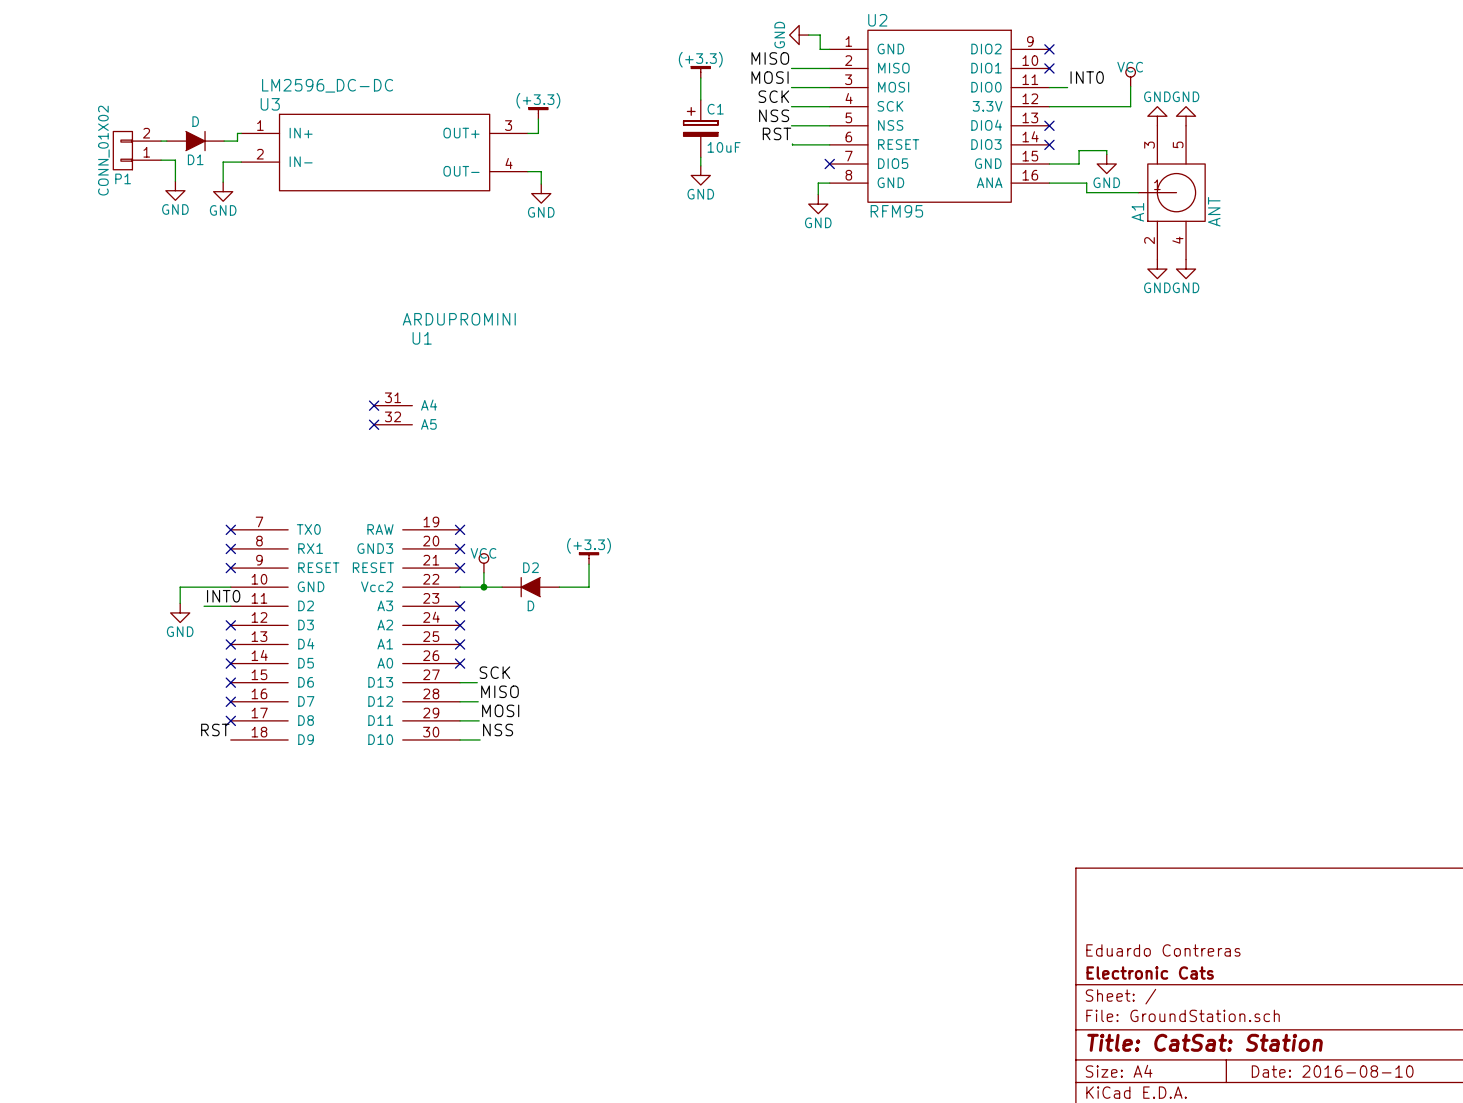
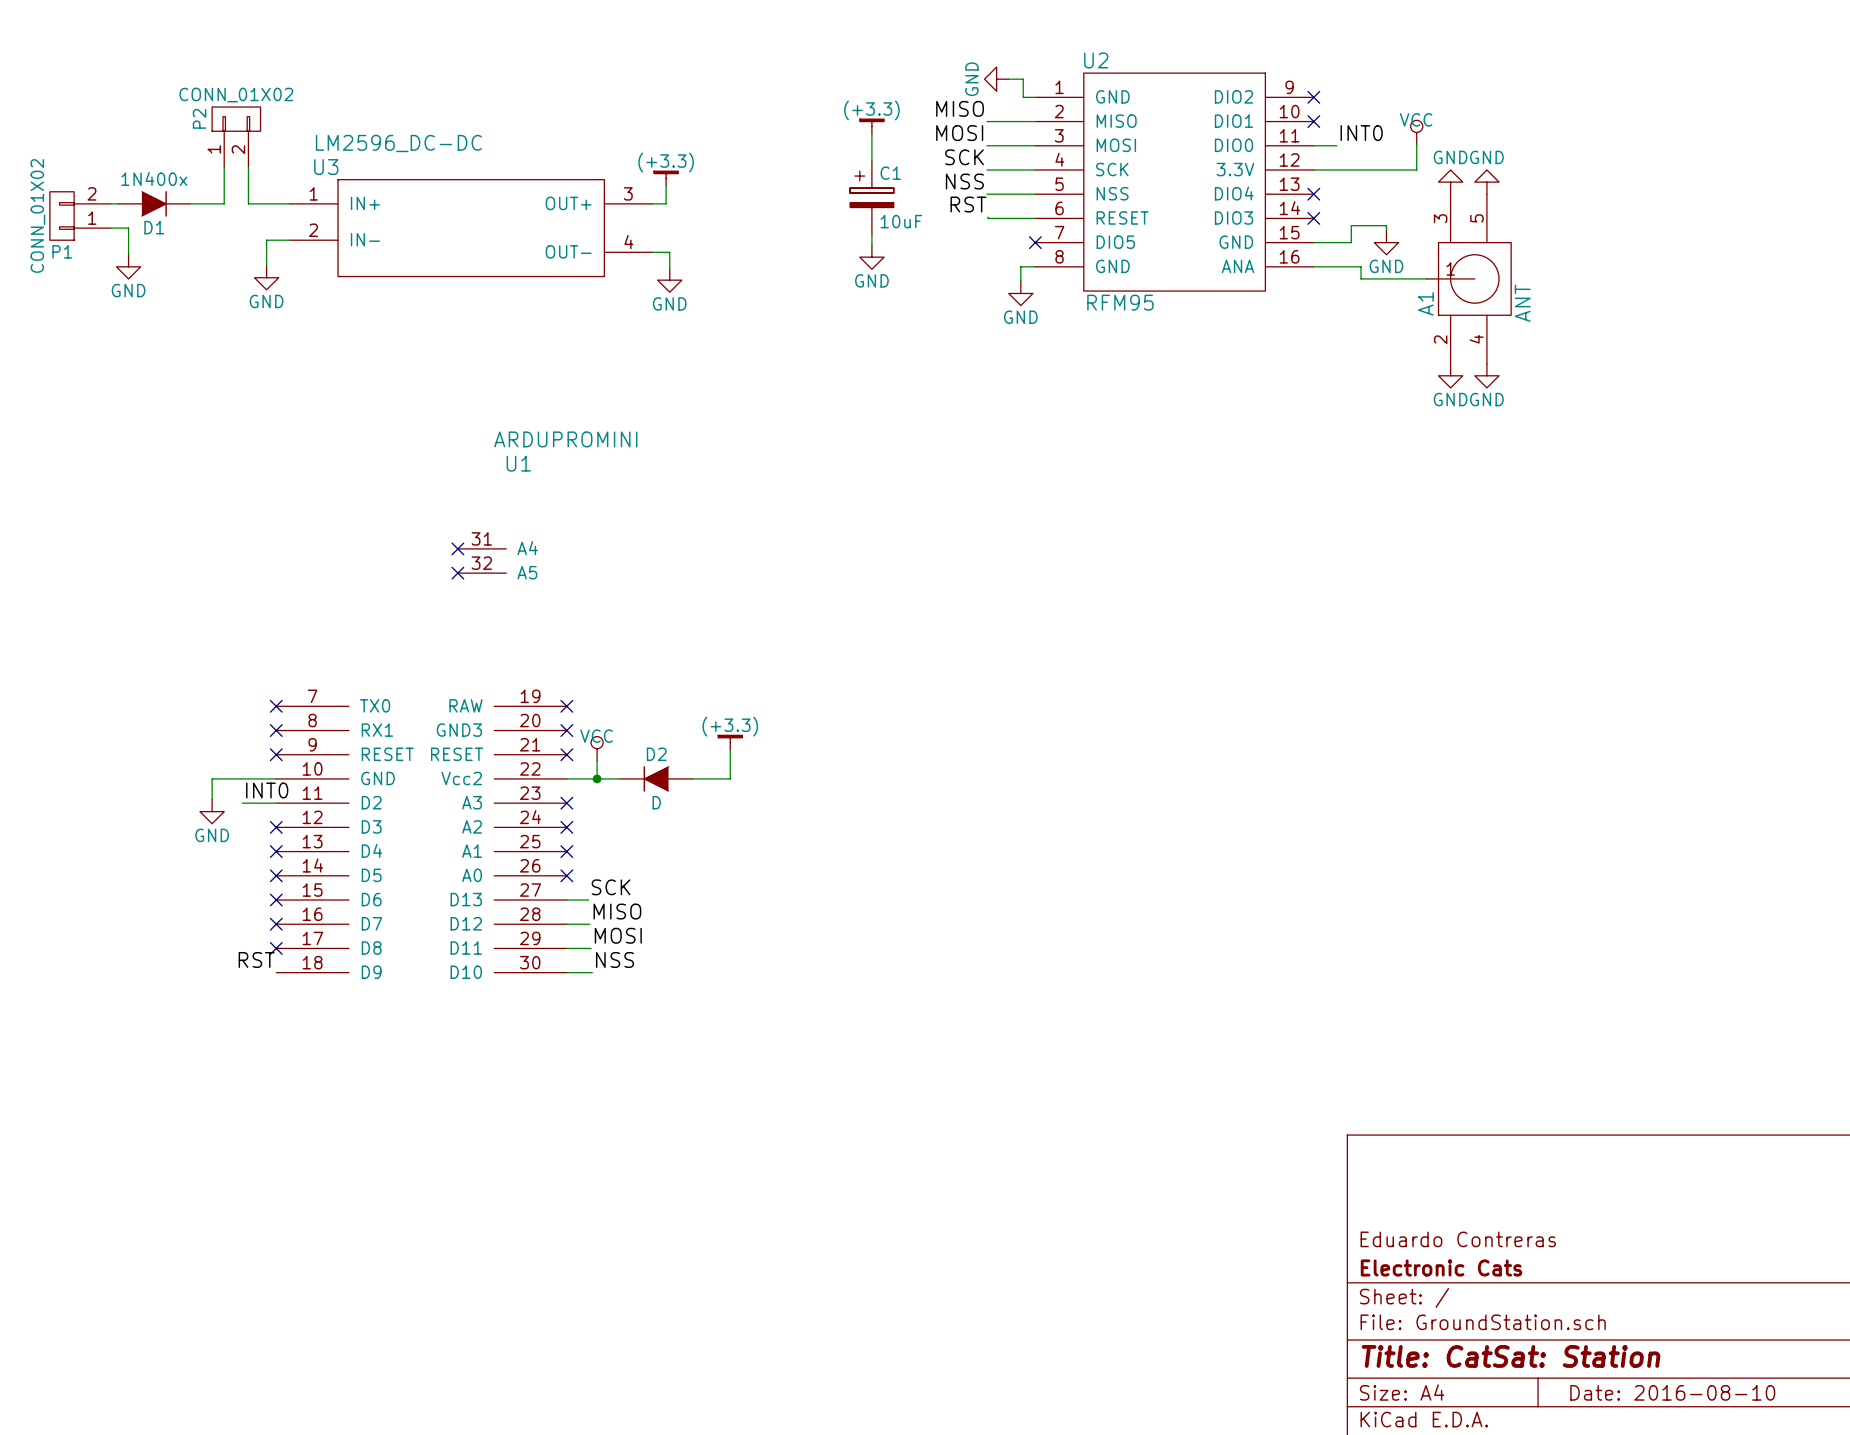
P2: none -> CONN_01X02 (236, 137)
wire: none -> (224, 167) (224, 203) (190, 203)
D1 value: D (195, 121) -> 1N400x (154, 178)
wire: (237, 133) (237, 141) (224, 141) -> (284, 203) (248, 203) (248, 167)
wire: (161, 141) (166, 141) -> (110, 203) (117, 203)
D1 position: (195, 141) -> (154, 203)
P1 position: (137, 150) -> (80, 215)
wire: (161, 160) (175, 160) (175, 181) -> (110, 228) (128, 228) (128, 254)
power symbol position: GND (175, 190) -> GND (128, 266)

